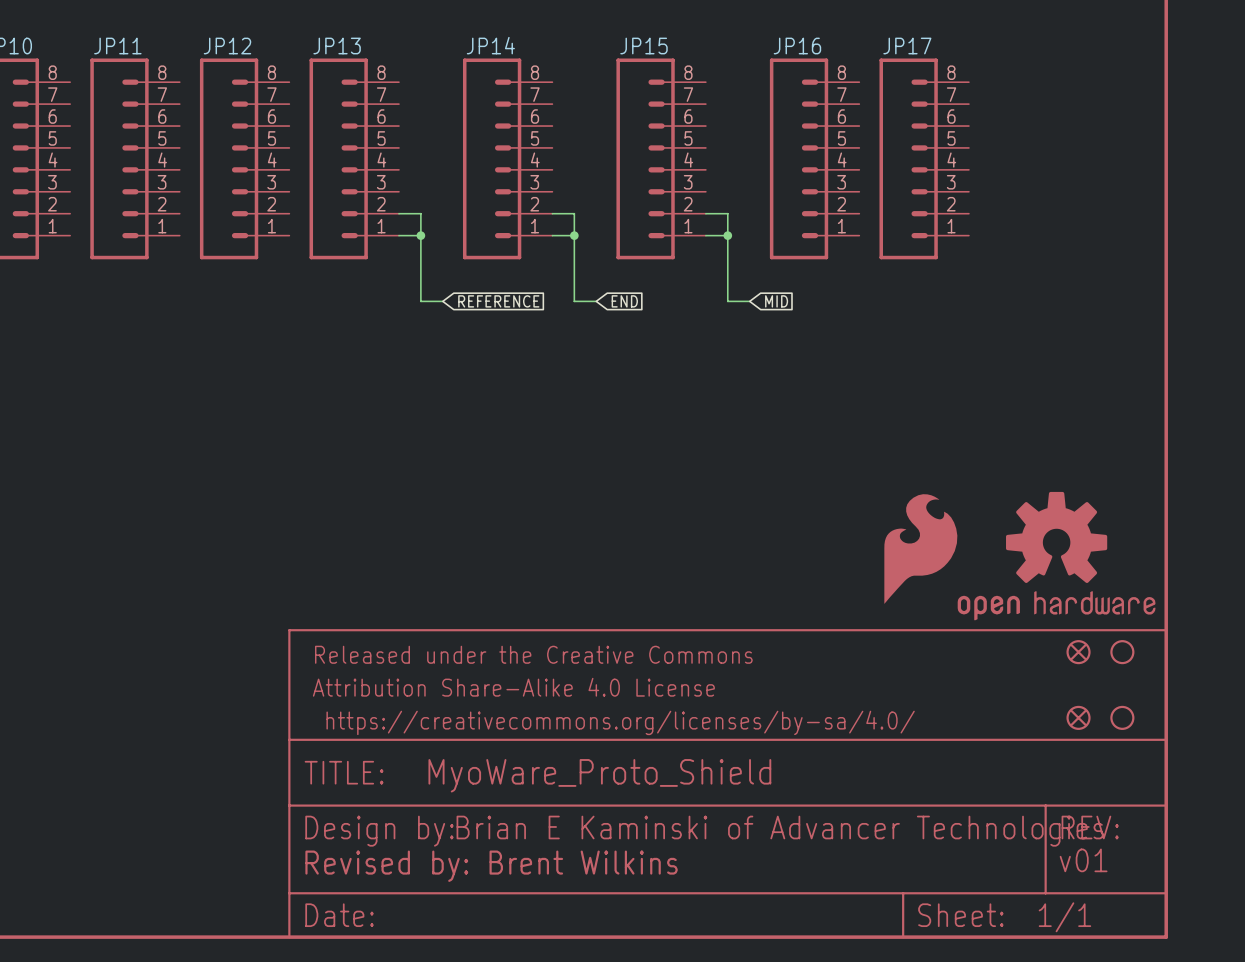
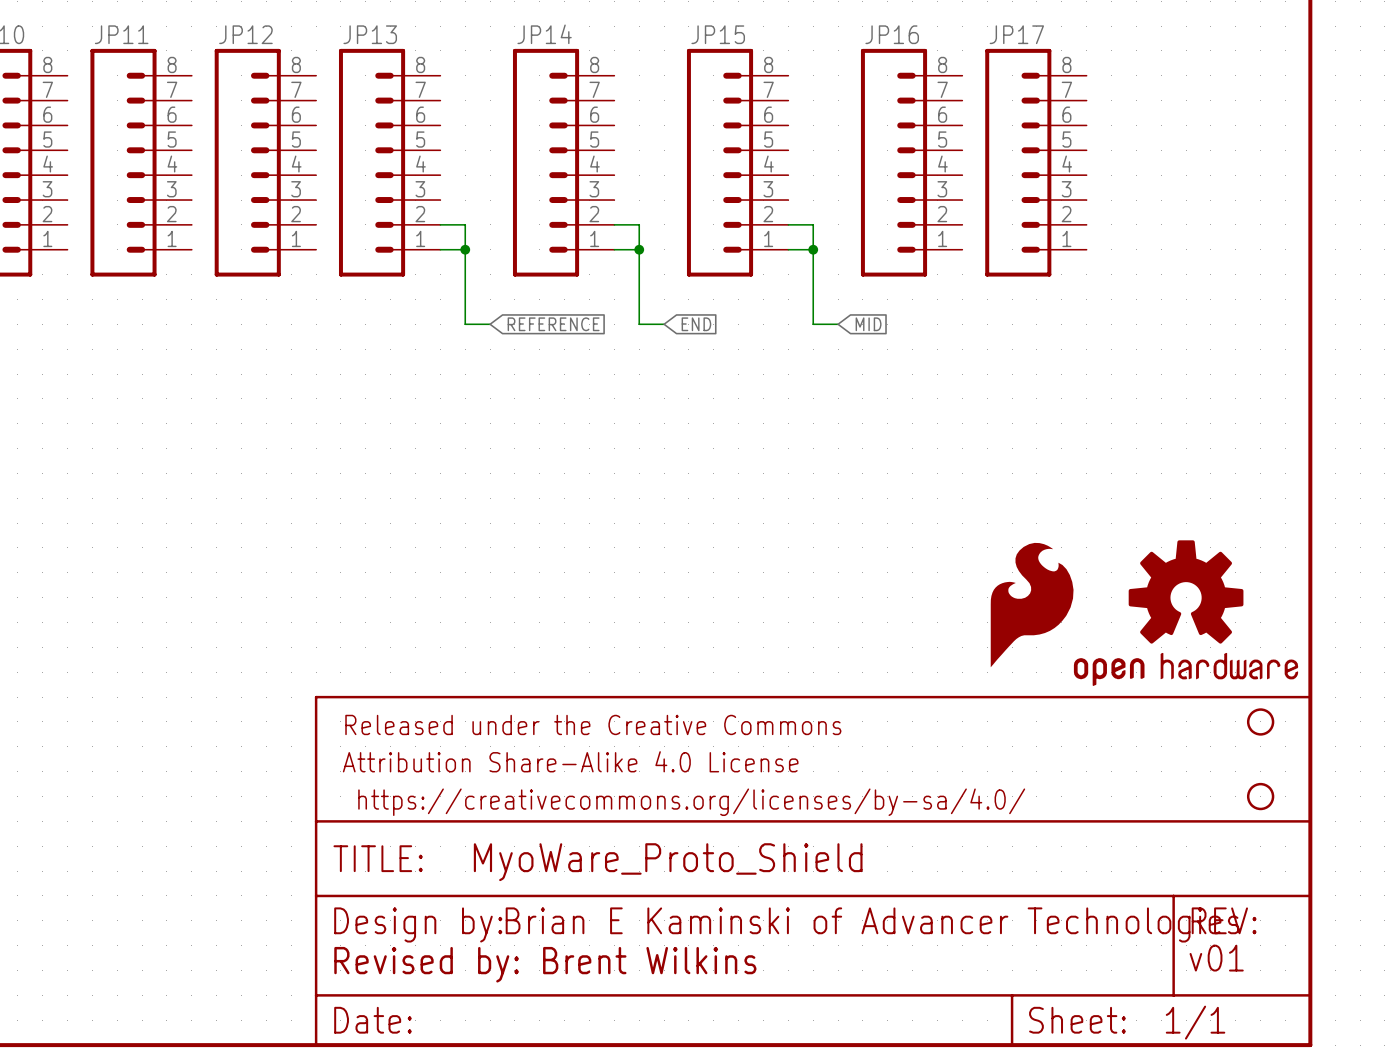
part: (1078, 652) -> none
part: (1078, 717) -> none

